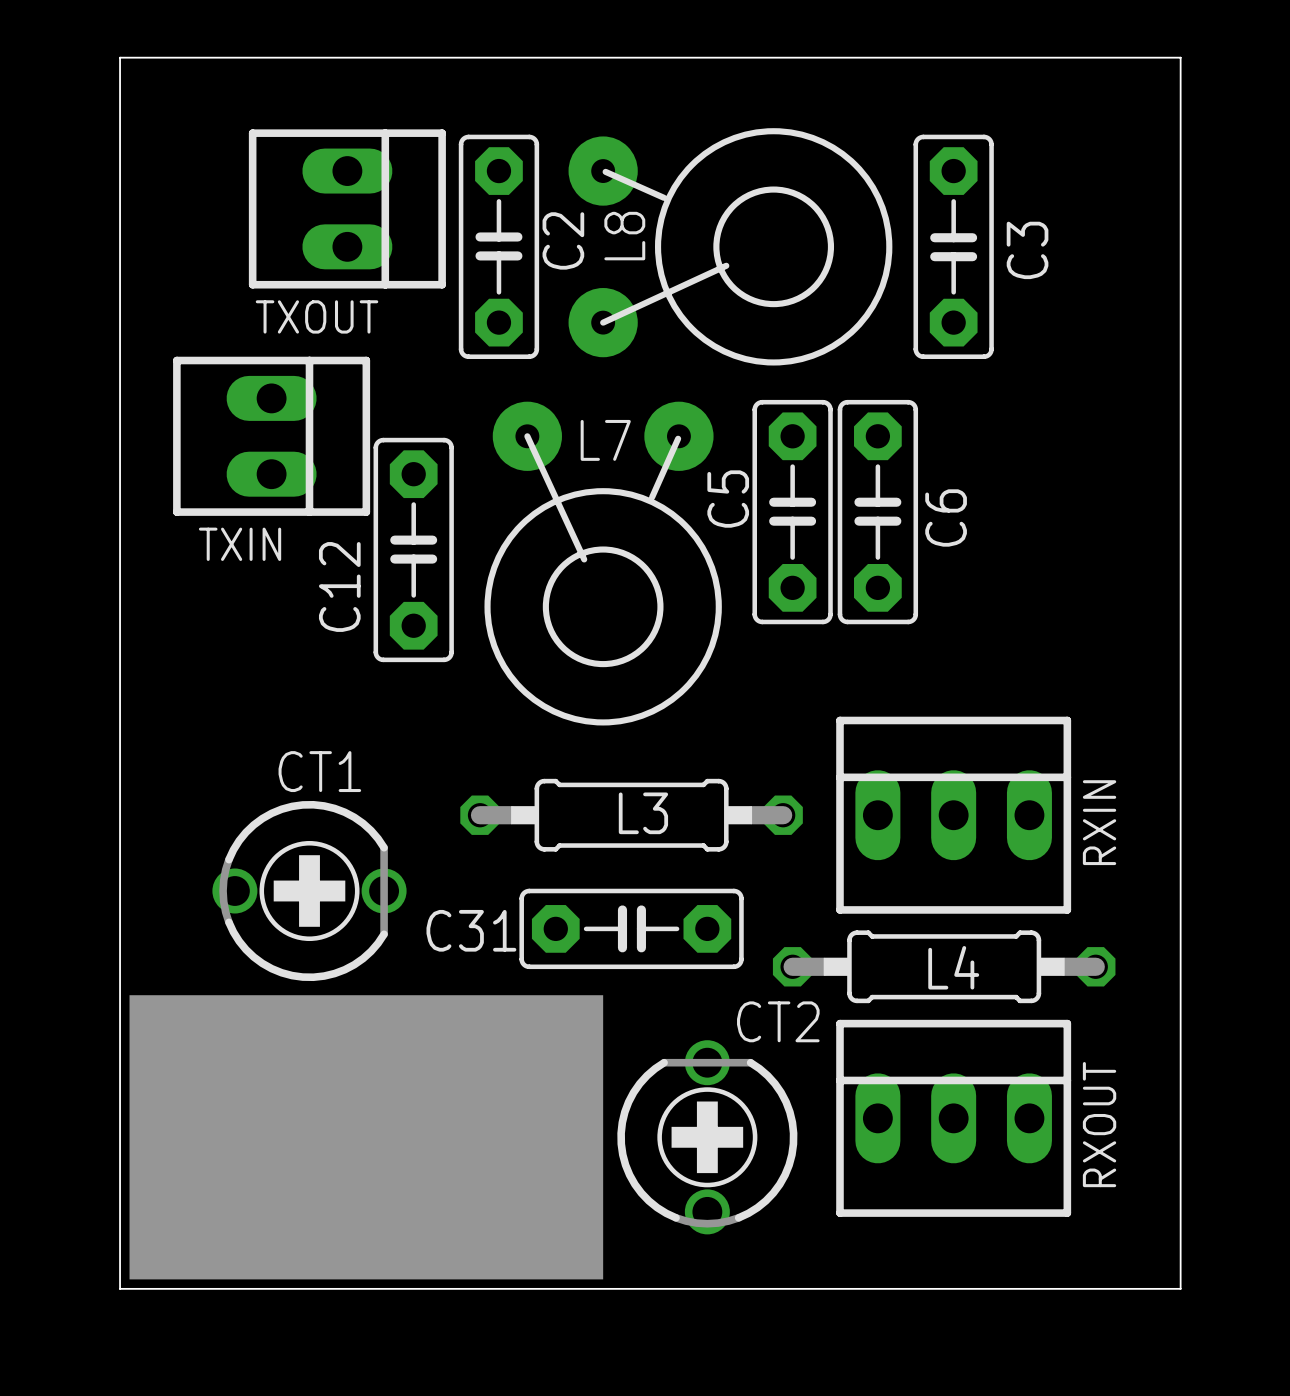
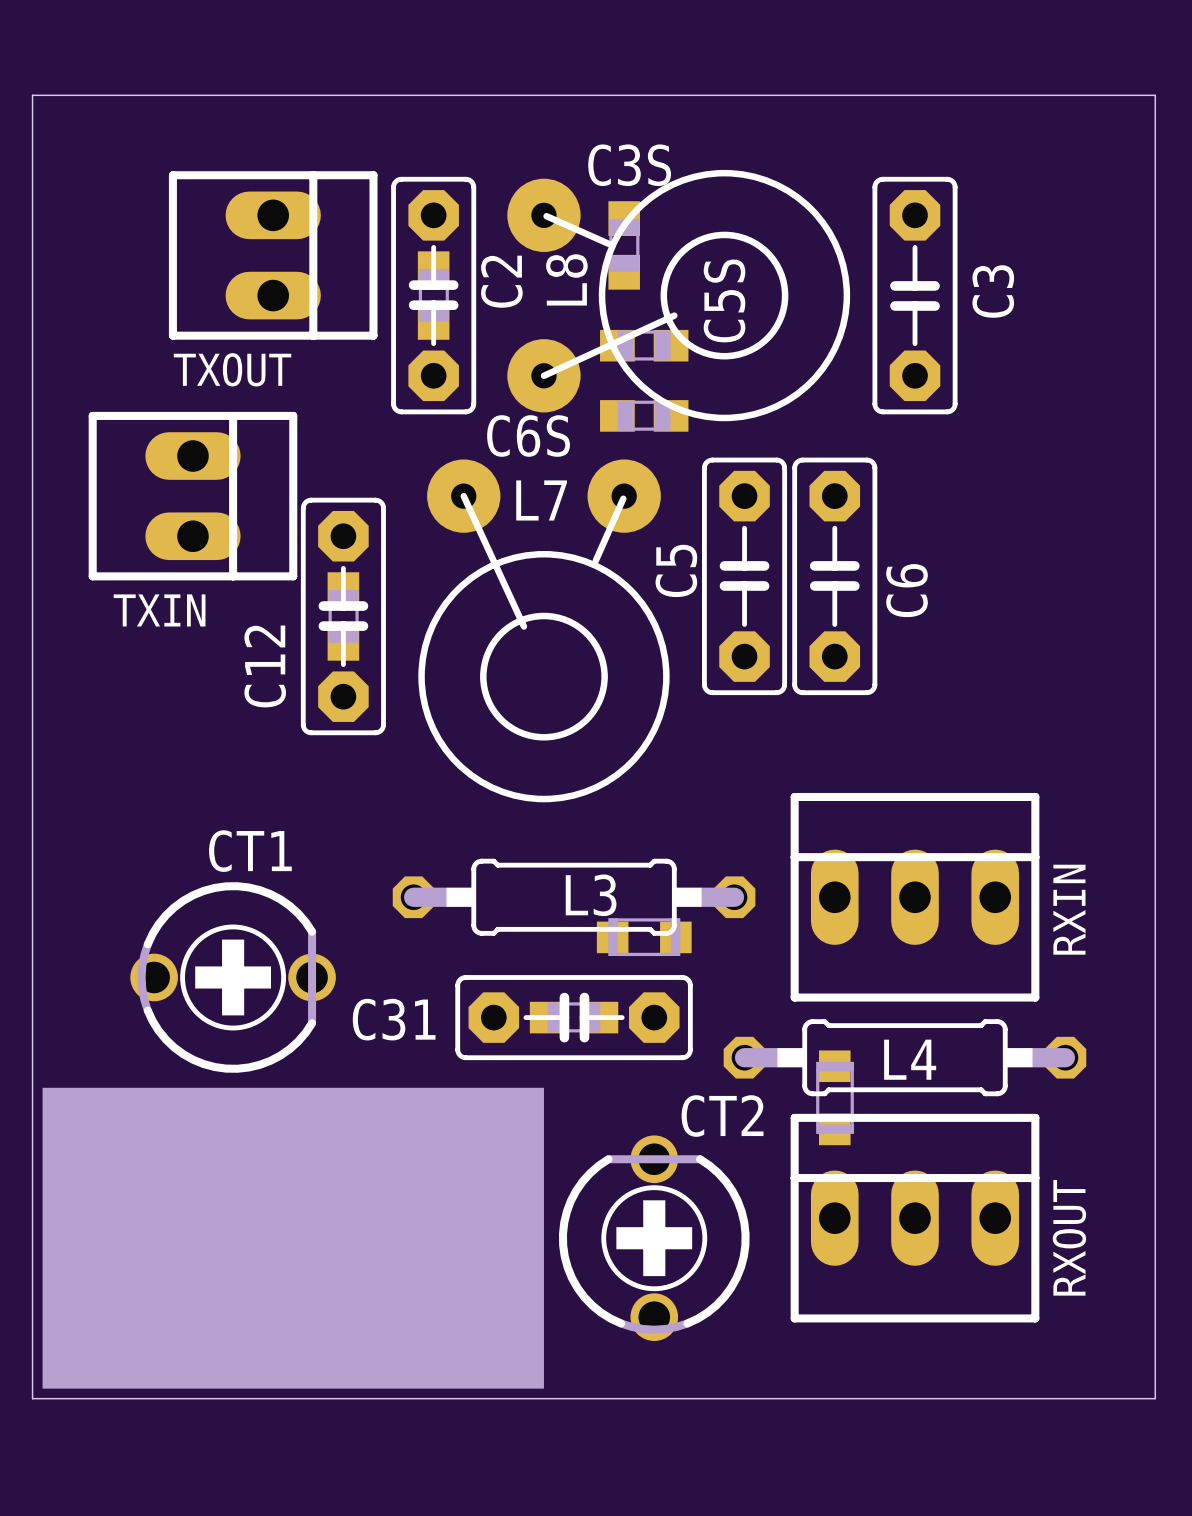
C3S: none -> (624, 245)
part: none -> (433, 295)
C5S: none -> (644, 345)
C6S: none -> (644, 415)
part: none -> (343, 616)
part: none -> (644, 937)
part: none -> (574, 1017)
part: none -> (835, 1097)

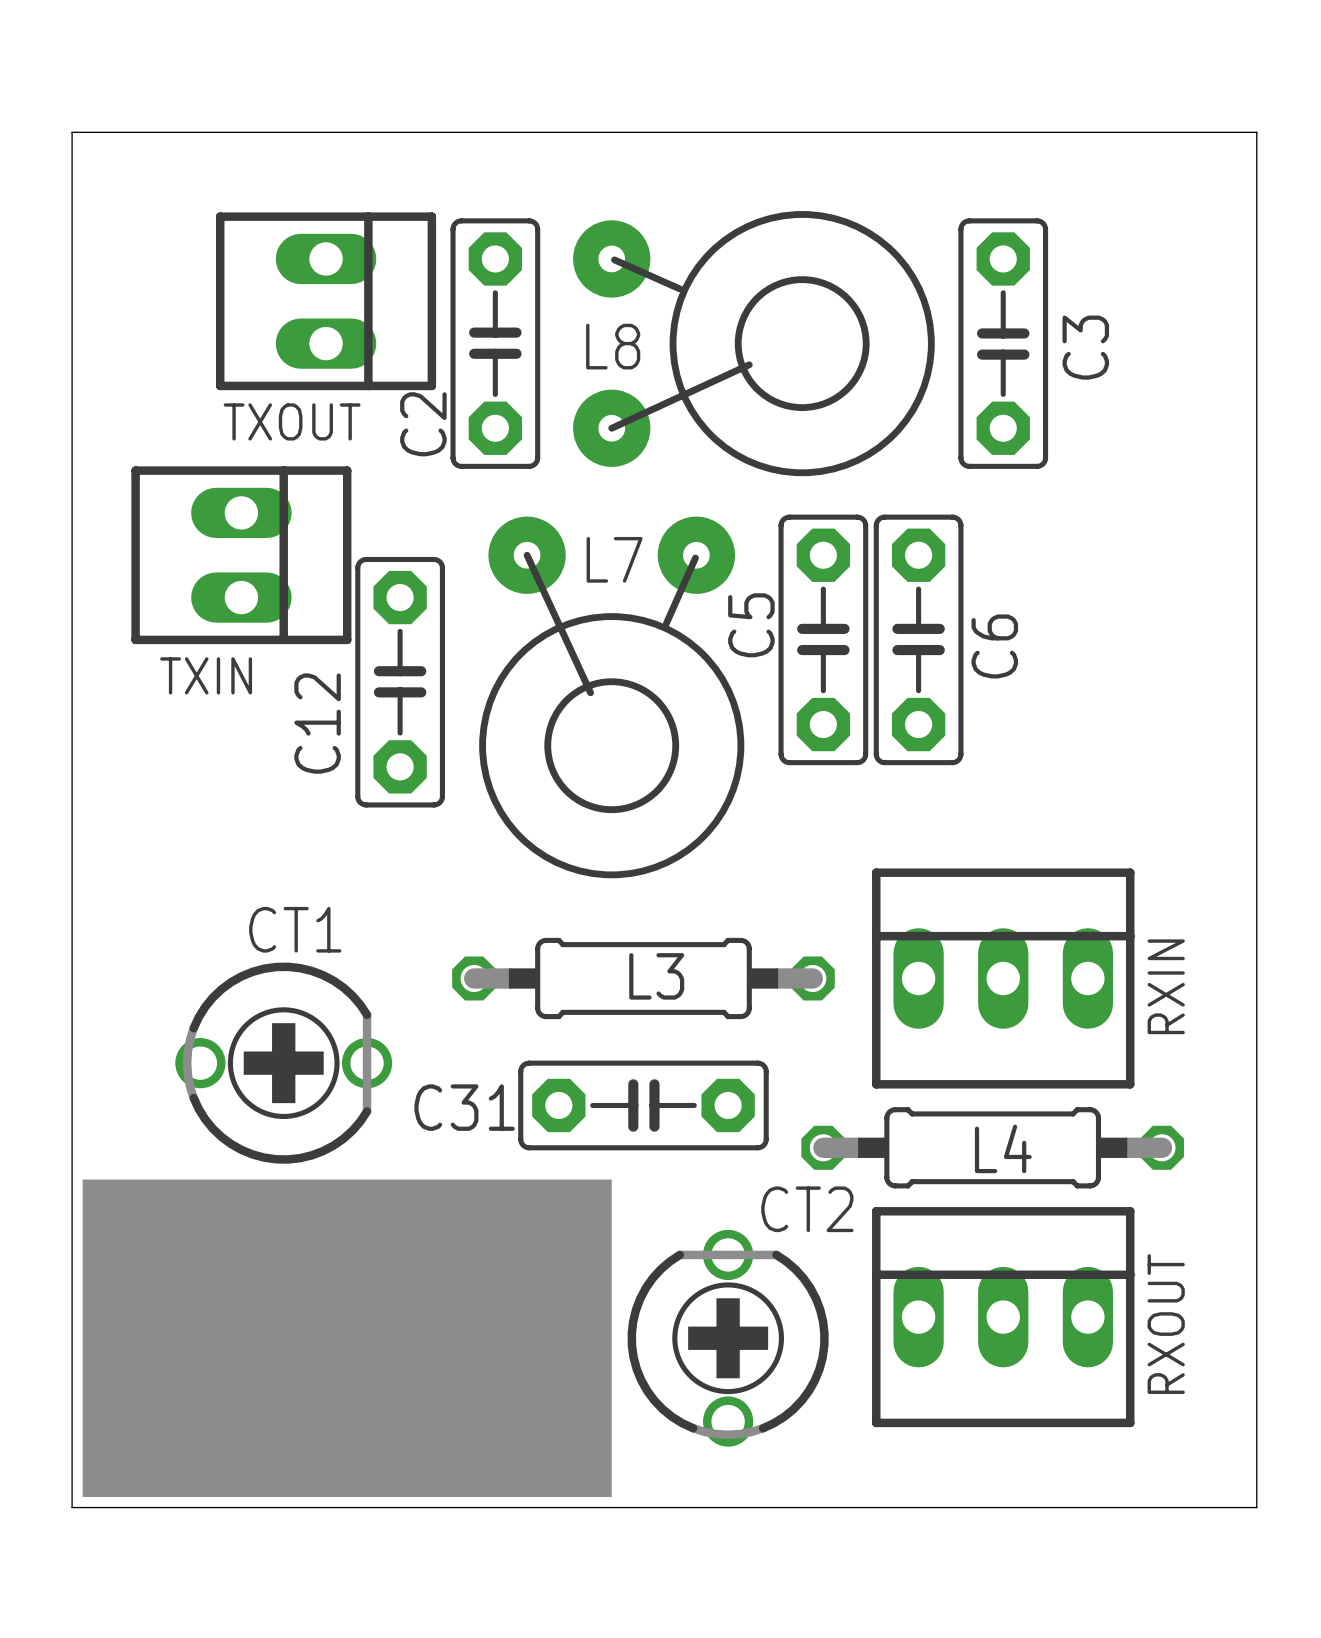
C3S: (624, 245) -> none
L8 name rotation: 0° (566, 279) -> 90° clockwise (613, 346)
C2 name position: C2 (501, 281) -> C2 (423, 424)
part: (433, 295) -> none
C5S: (644, 345) -> none
C6S: (644, 415) -> none
part: (343, 616) -> none
part: (644, 937) -> none
part: (574, 1017) -> none
part: (835, 1097) -> none

